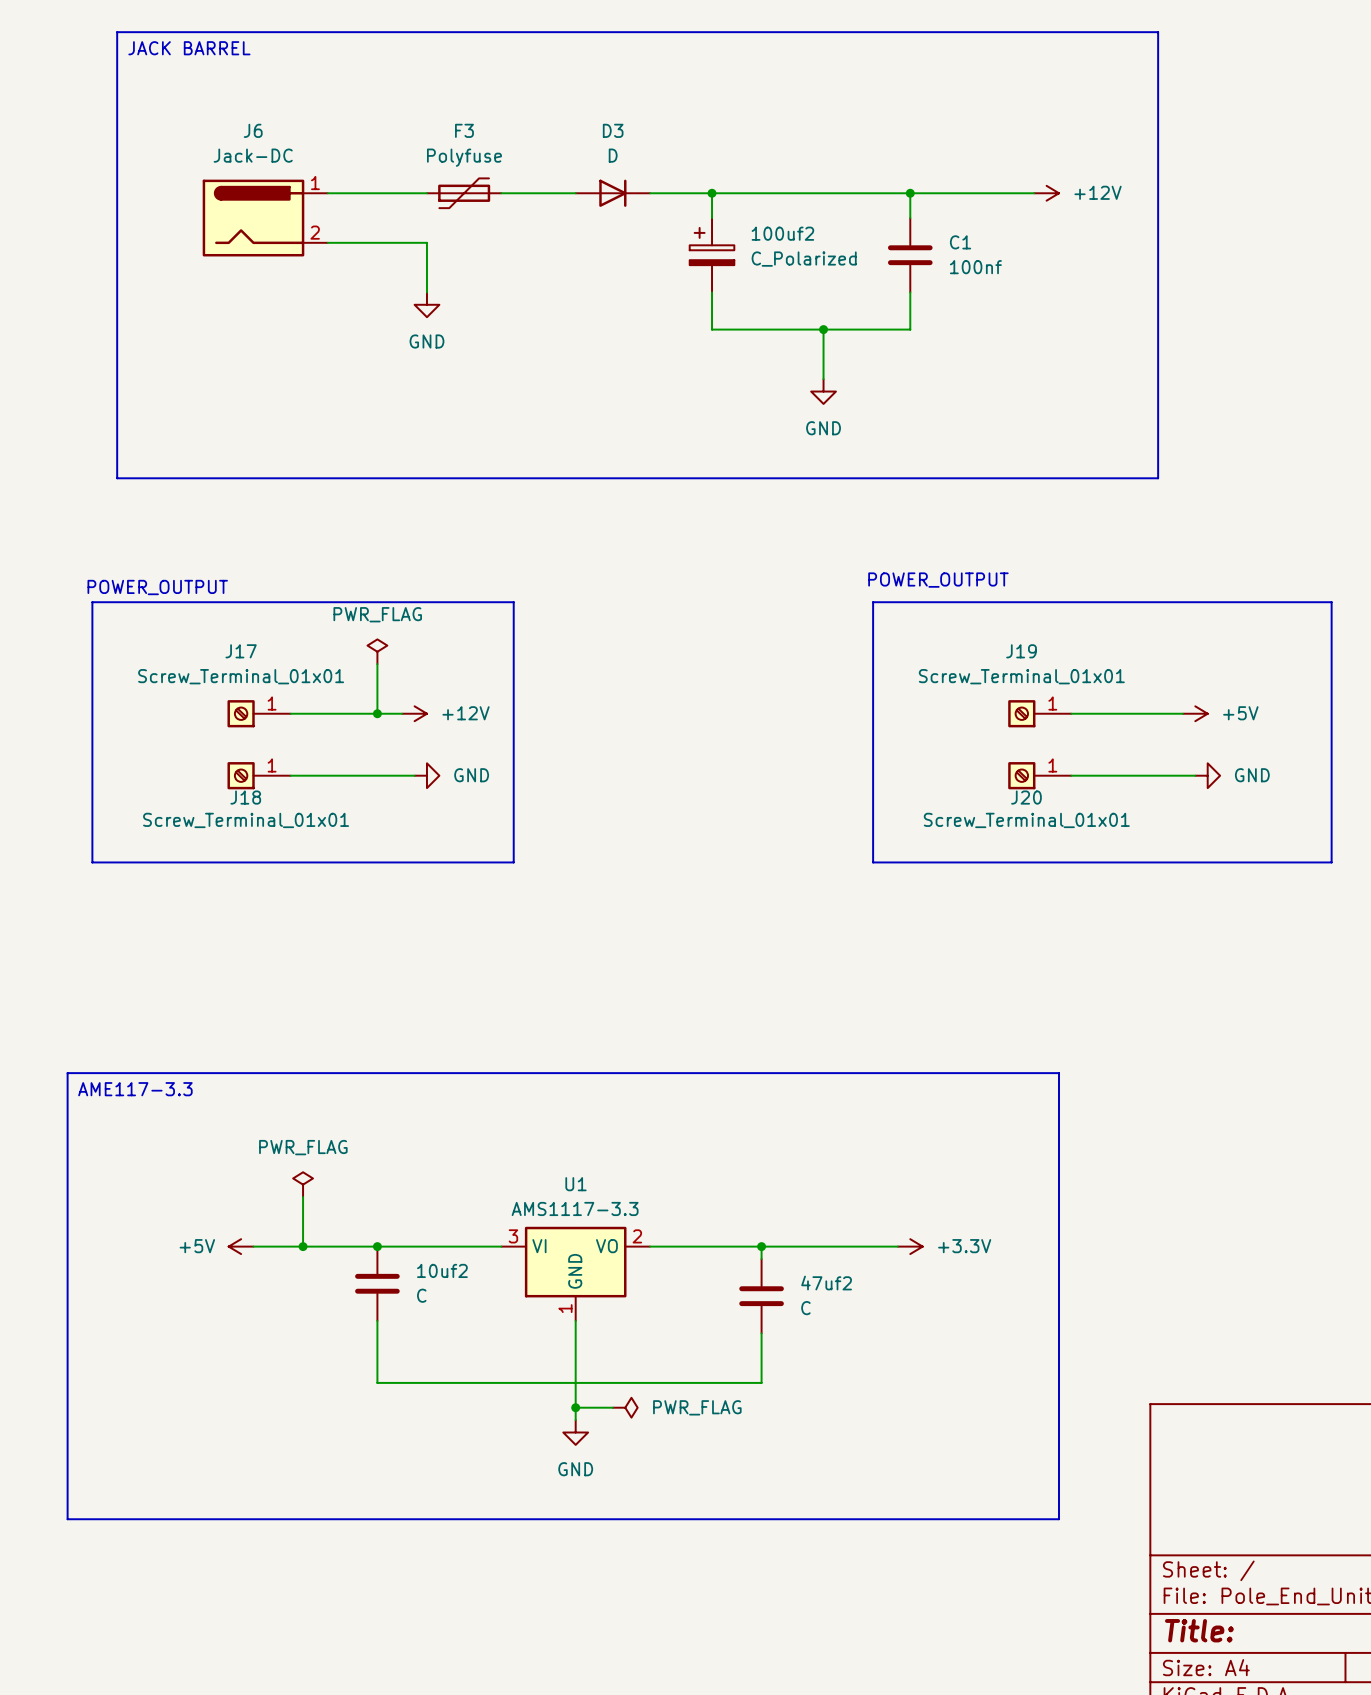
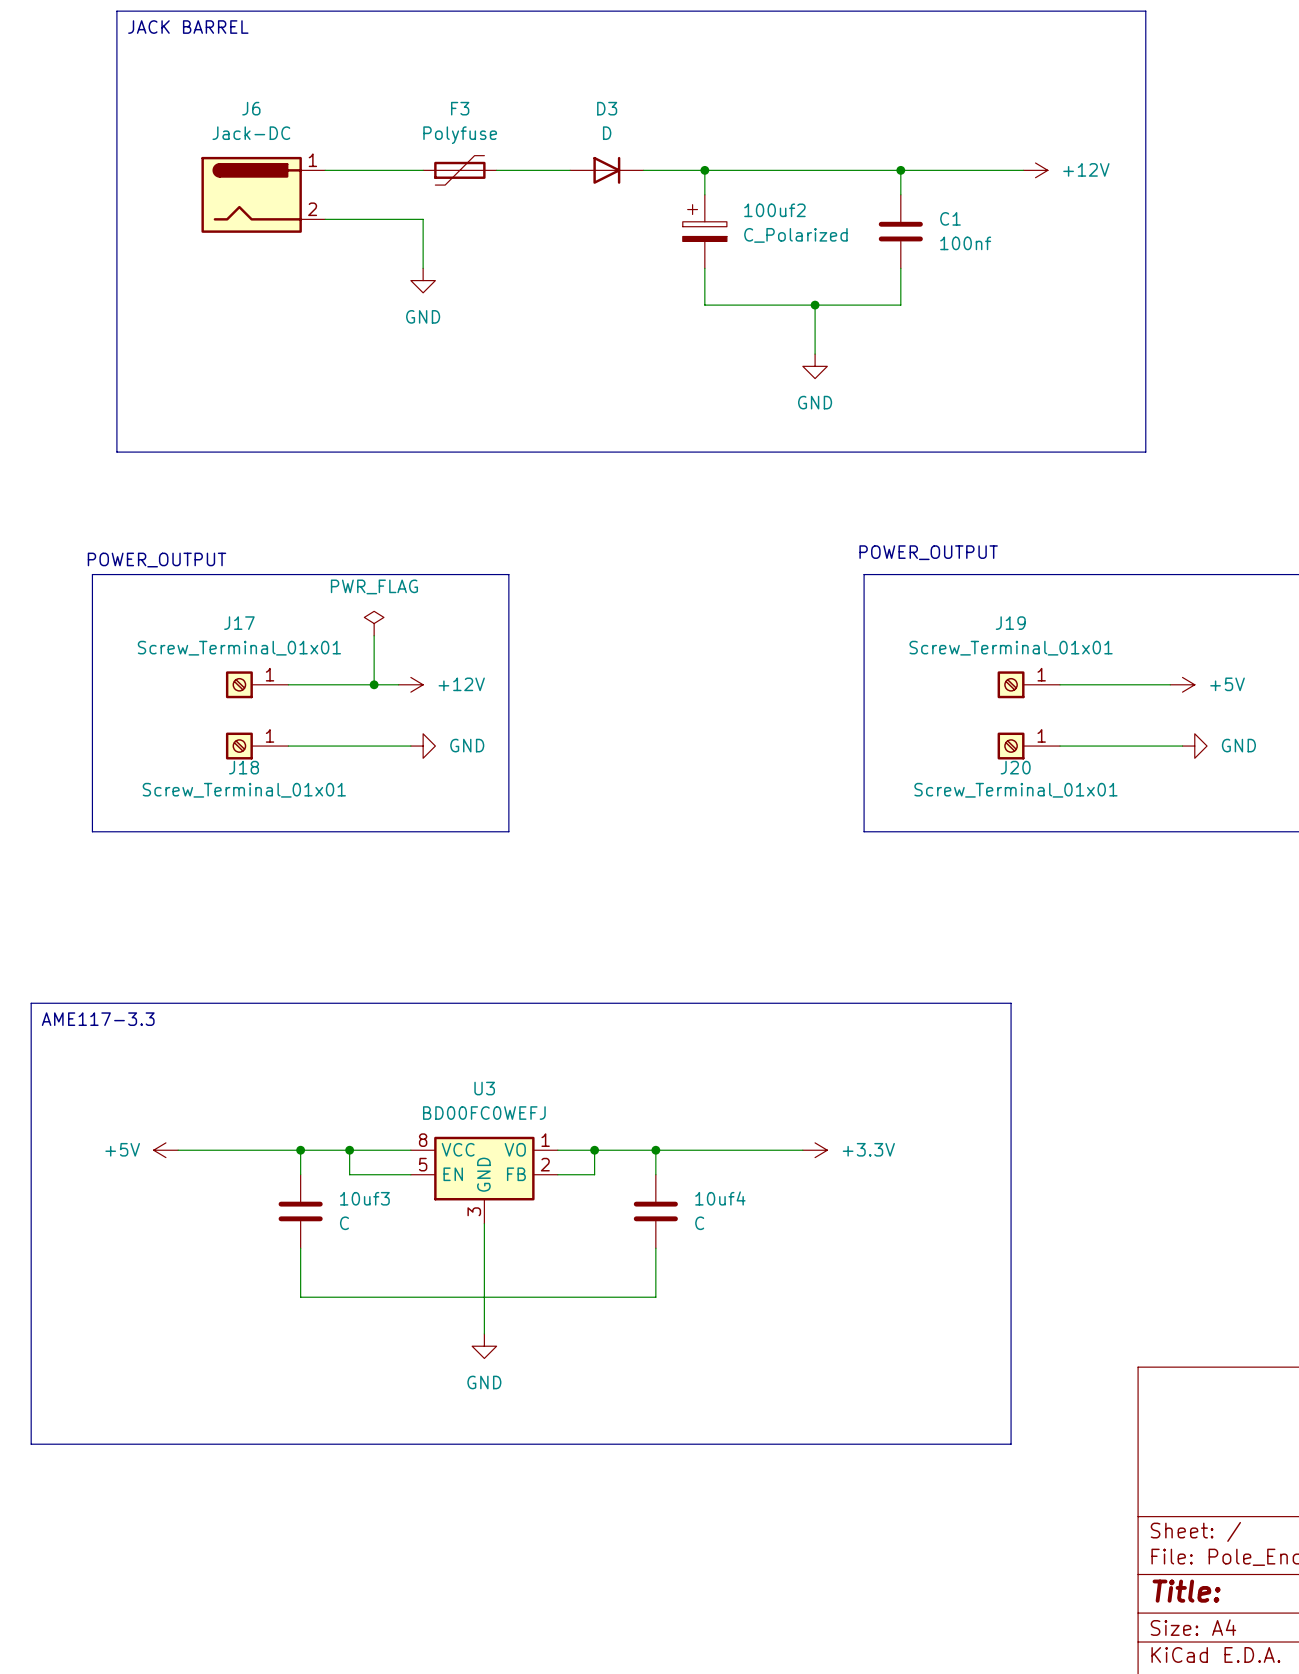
line: (67, 1073) (1058, 1073) (1058, 1519) (67, 1519) (67, 1073) -> (31, 1003) (1011, 1003) (1011, 1444) (31, 1444) (31, 1003)
text position: AME117-3.3 (135, 1089) -> AME117-3.3 (98, 1019)
wire: none -> (178, 1150) (410, 1150)
junction: none -> (300, 1150)
power symbol: PWR_FLAG (303, 1184) -> none
wire: none -> (349, 1150) (349, 1174) (410, 1174)
junction: none -> (349, 1150)
wire: none -> (594, 1150) (594, 1174) (557, 1174)
junction: none -> (594, 1150)
wire: none -> (655, 1150) (655, 1174)
junction: none -> (655, 1150)
U3: none -> BD00FC0WEFJ (484, 1180)
power symbol position: +5V (241, 1246) -> +5V (165, 1150)
wire: (253, 1246) (501, 1246) -> none
junction: (303, 1246) -> none
10uf3: none -> C (300, 1211)
junction: (377, 1246) -> none
wire: (650, 1246) (897, 1246) -> (557, 1150) (802, 1150)
10uf4: none -> C (655, 1211)
wire: (761, 1246) (761, 1259) -> none
junction: (761, 1246) -> none
power symbol position: +3.3V (910, 1246) -> +3.3V (815, 1150)
wire: none -> (484, 1223) (484, 1333)
U1: AMS1117-3.3 (575, 1273) -> none
wire: none -> (300, 1248) (300, 1297) (655, 1297) (655, 1248)
10uf2: C (377, 1283) -> none
47uf2: C (761, 1296) -> none
wire: (377, 1320) (377, 1382) (761, 1382) (761, 1333) -> none
wire: (575, 1320) (575, 1420) -> none
wire: (575, 1407) (612, 1407) -> none
junction: (575, 1407) -> none
power symbol: PWR_FLAG (625, 1407) -> none
power symbol position: GND (575, 1432) -> GND (484, 1346)

